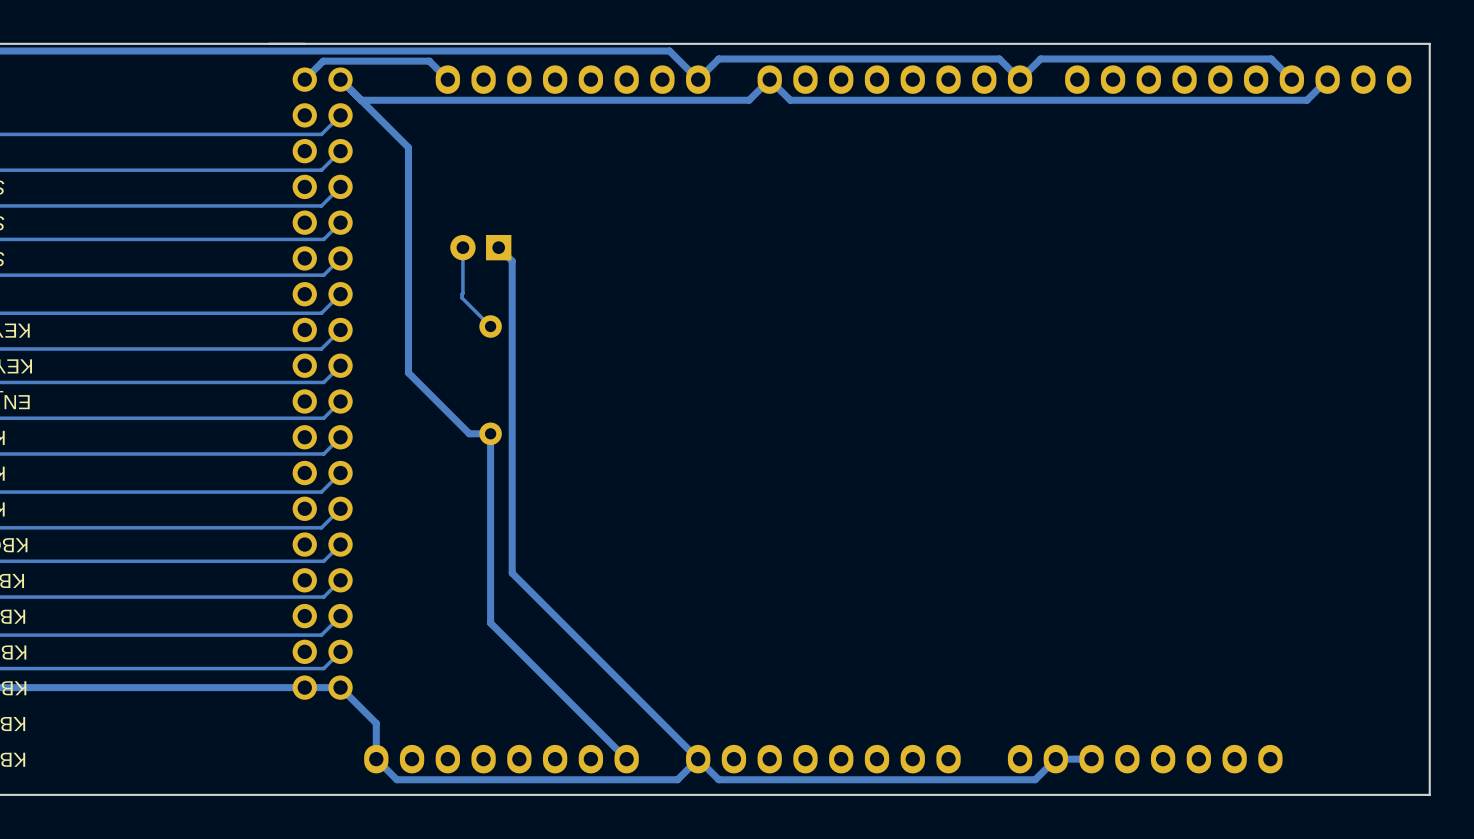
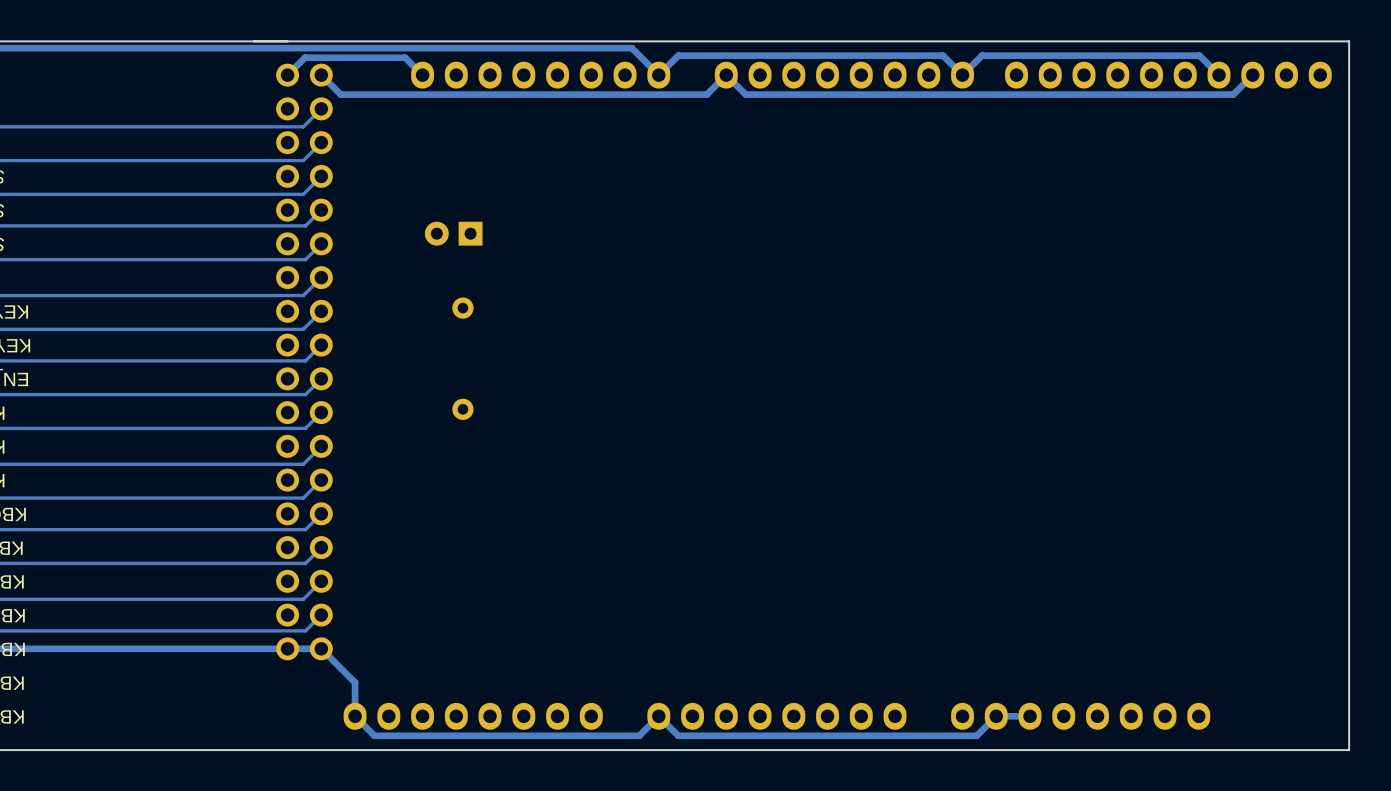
track: (361, 100) (408, 147) (408, 372) (469, 433) (490, 433) (490, 623) (626, 759) -> none
track: (462, 247) (462, 298) (490, 326) -> none
track: (498, 247) (512, 261) (512, 573) (698, 759) -> none

